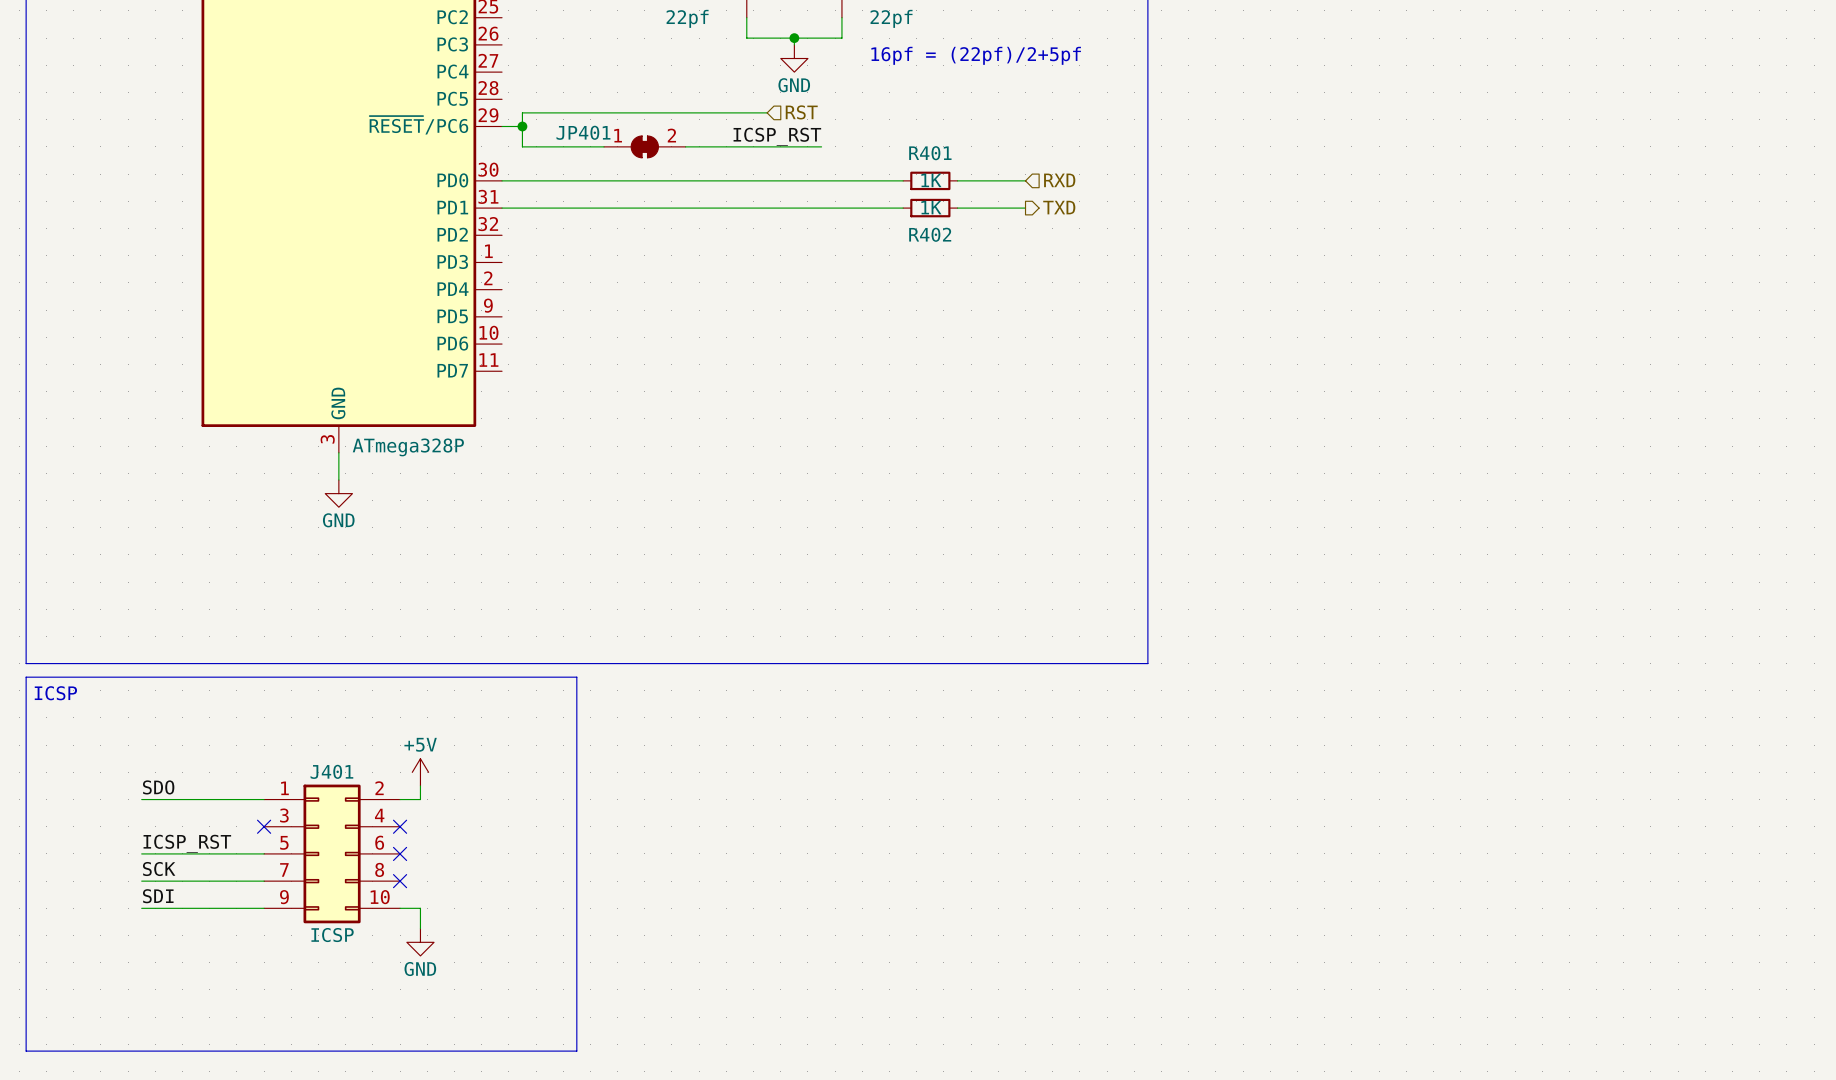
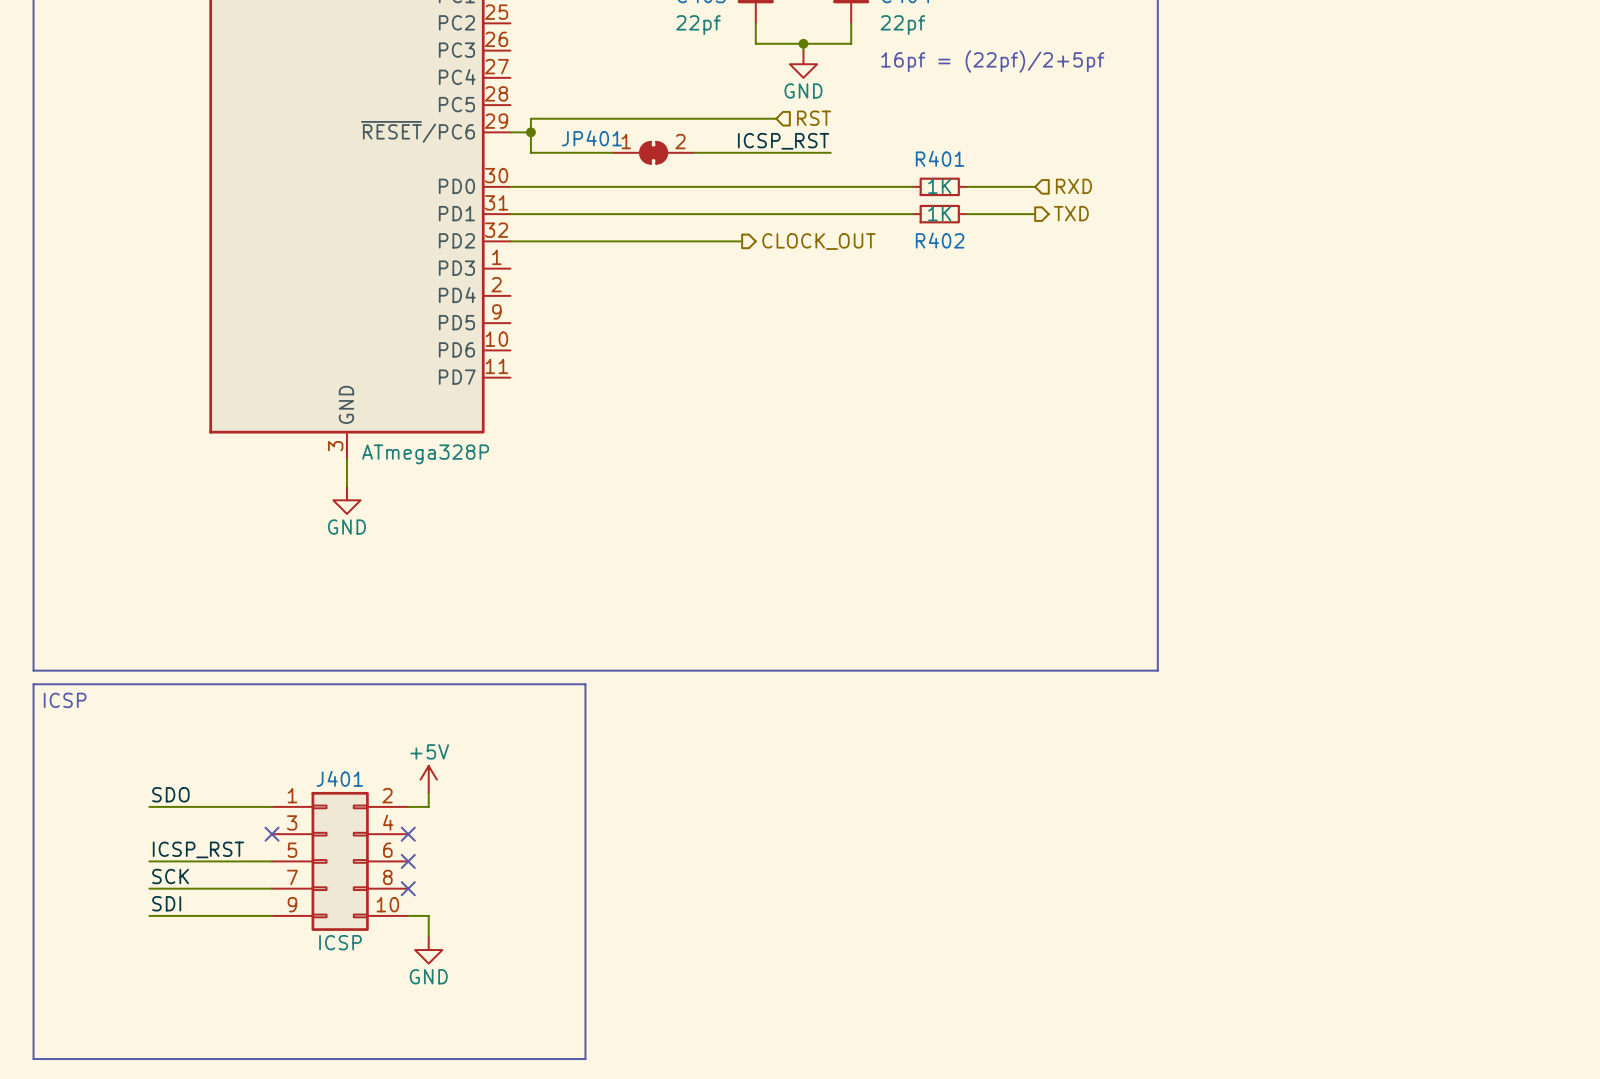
wire: none -> (510, 241) (742, 241)
hierarchical label: none -> CLOCK_OUT (818, 241)

